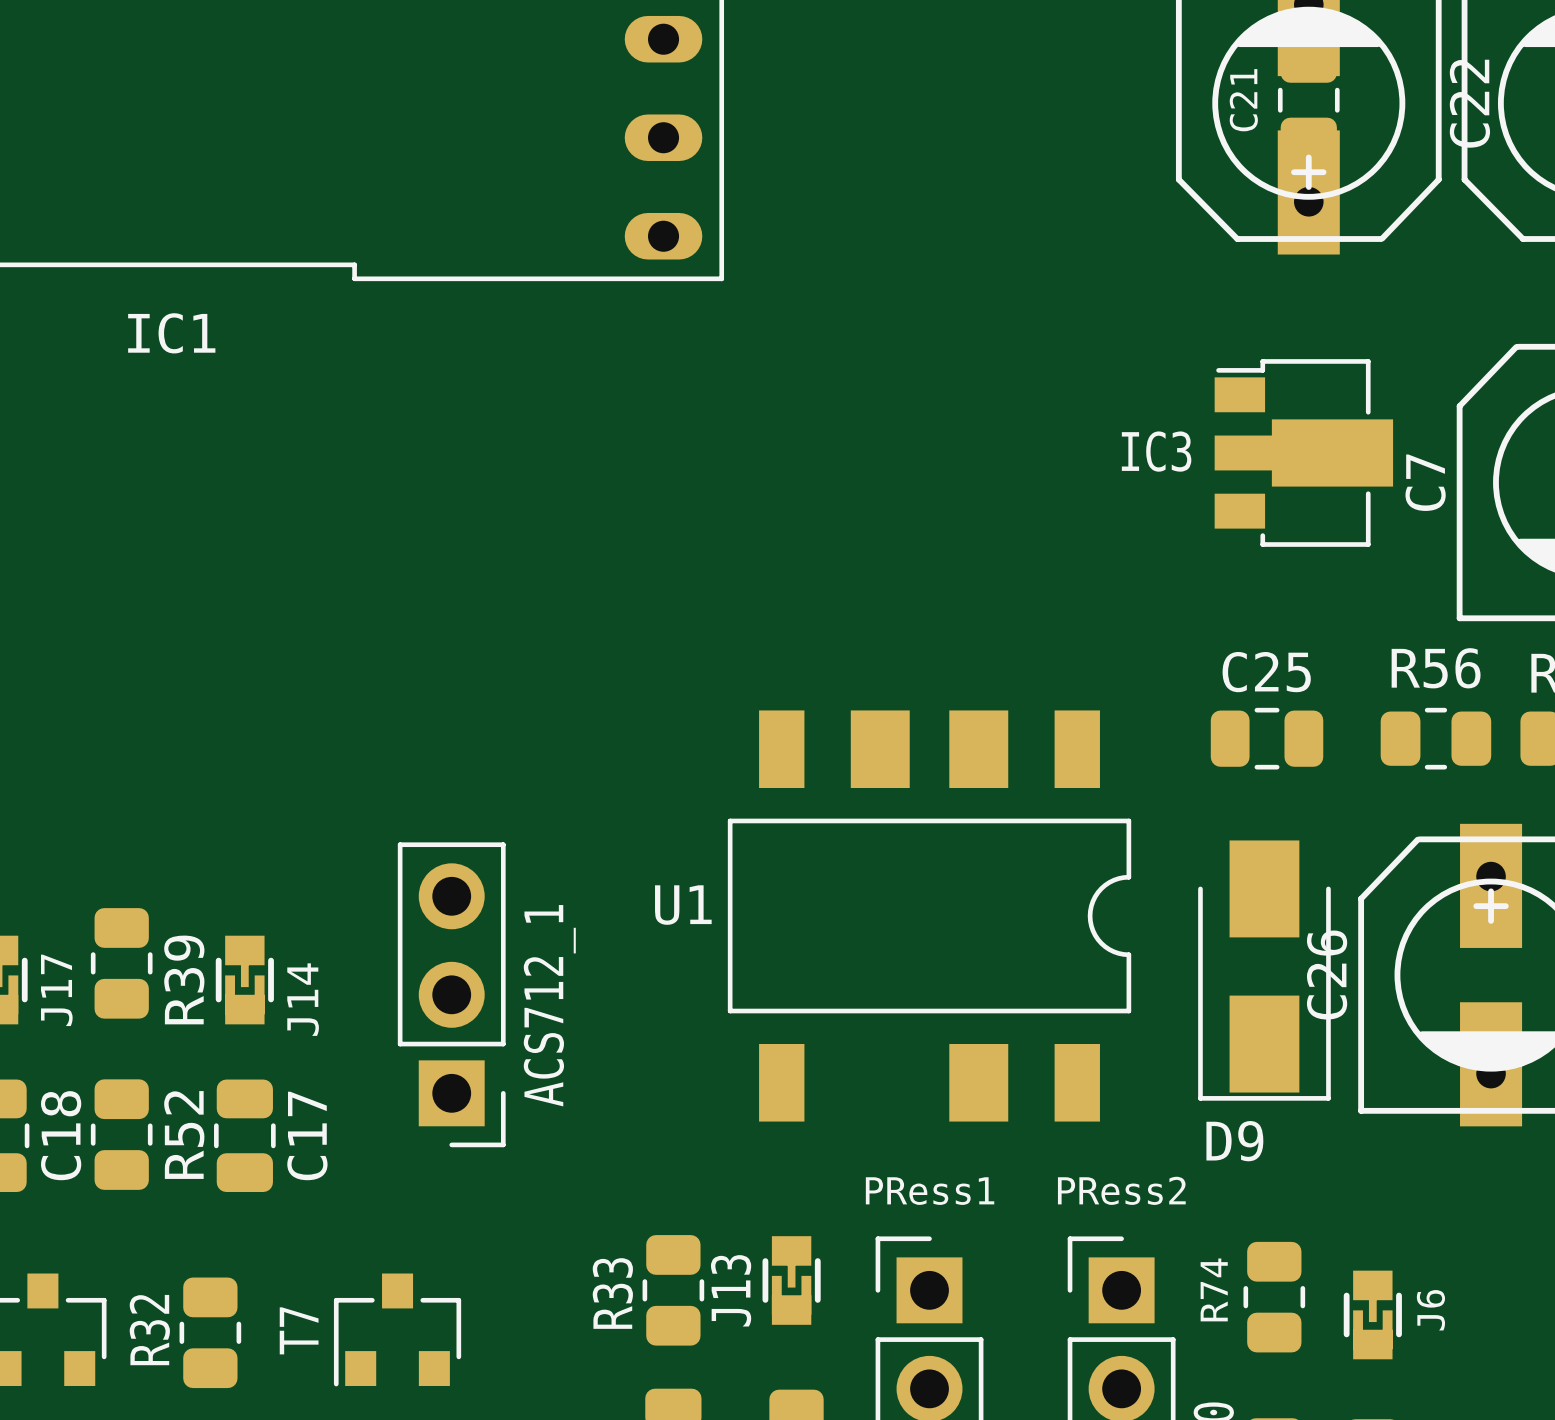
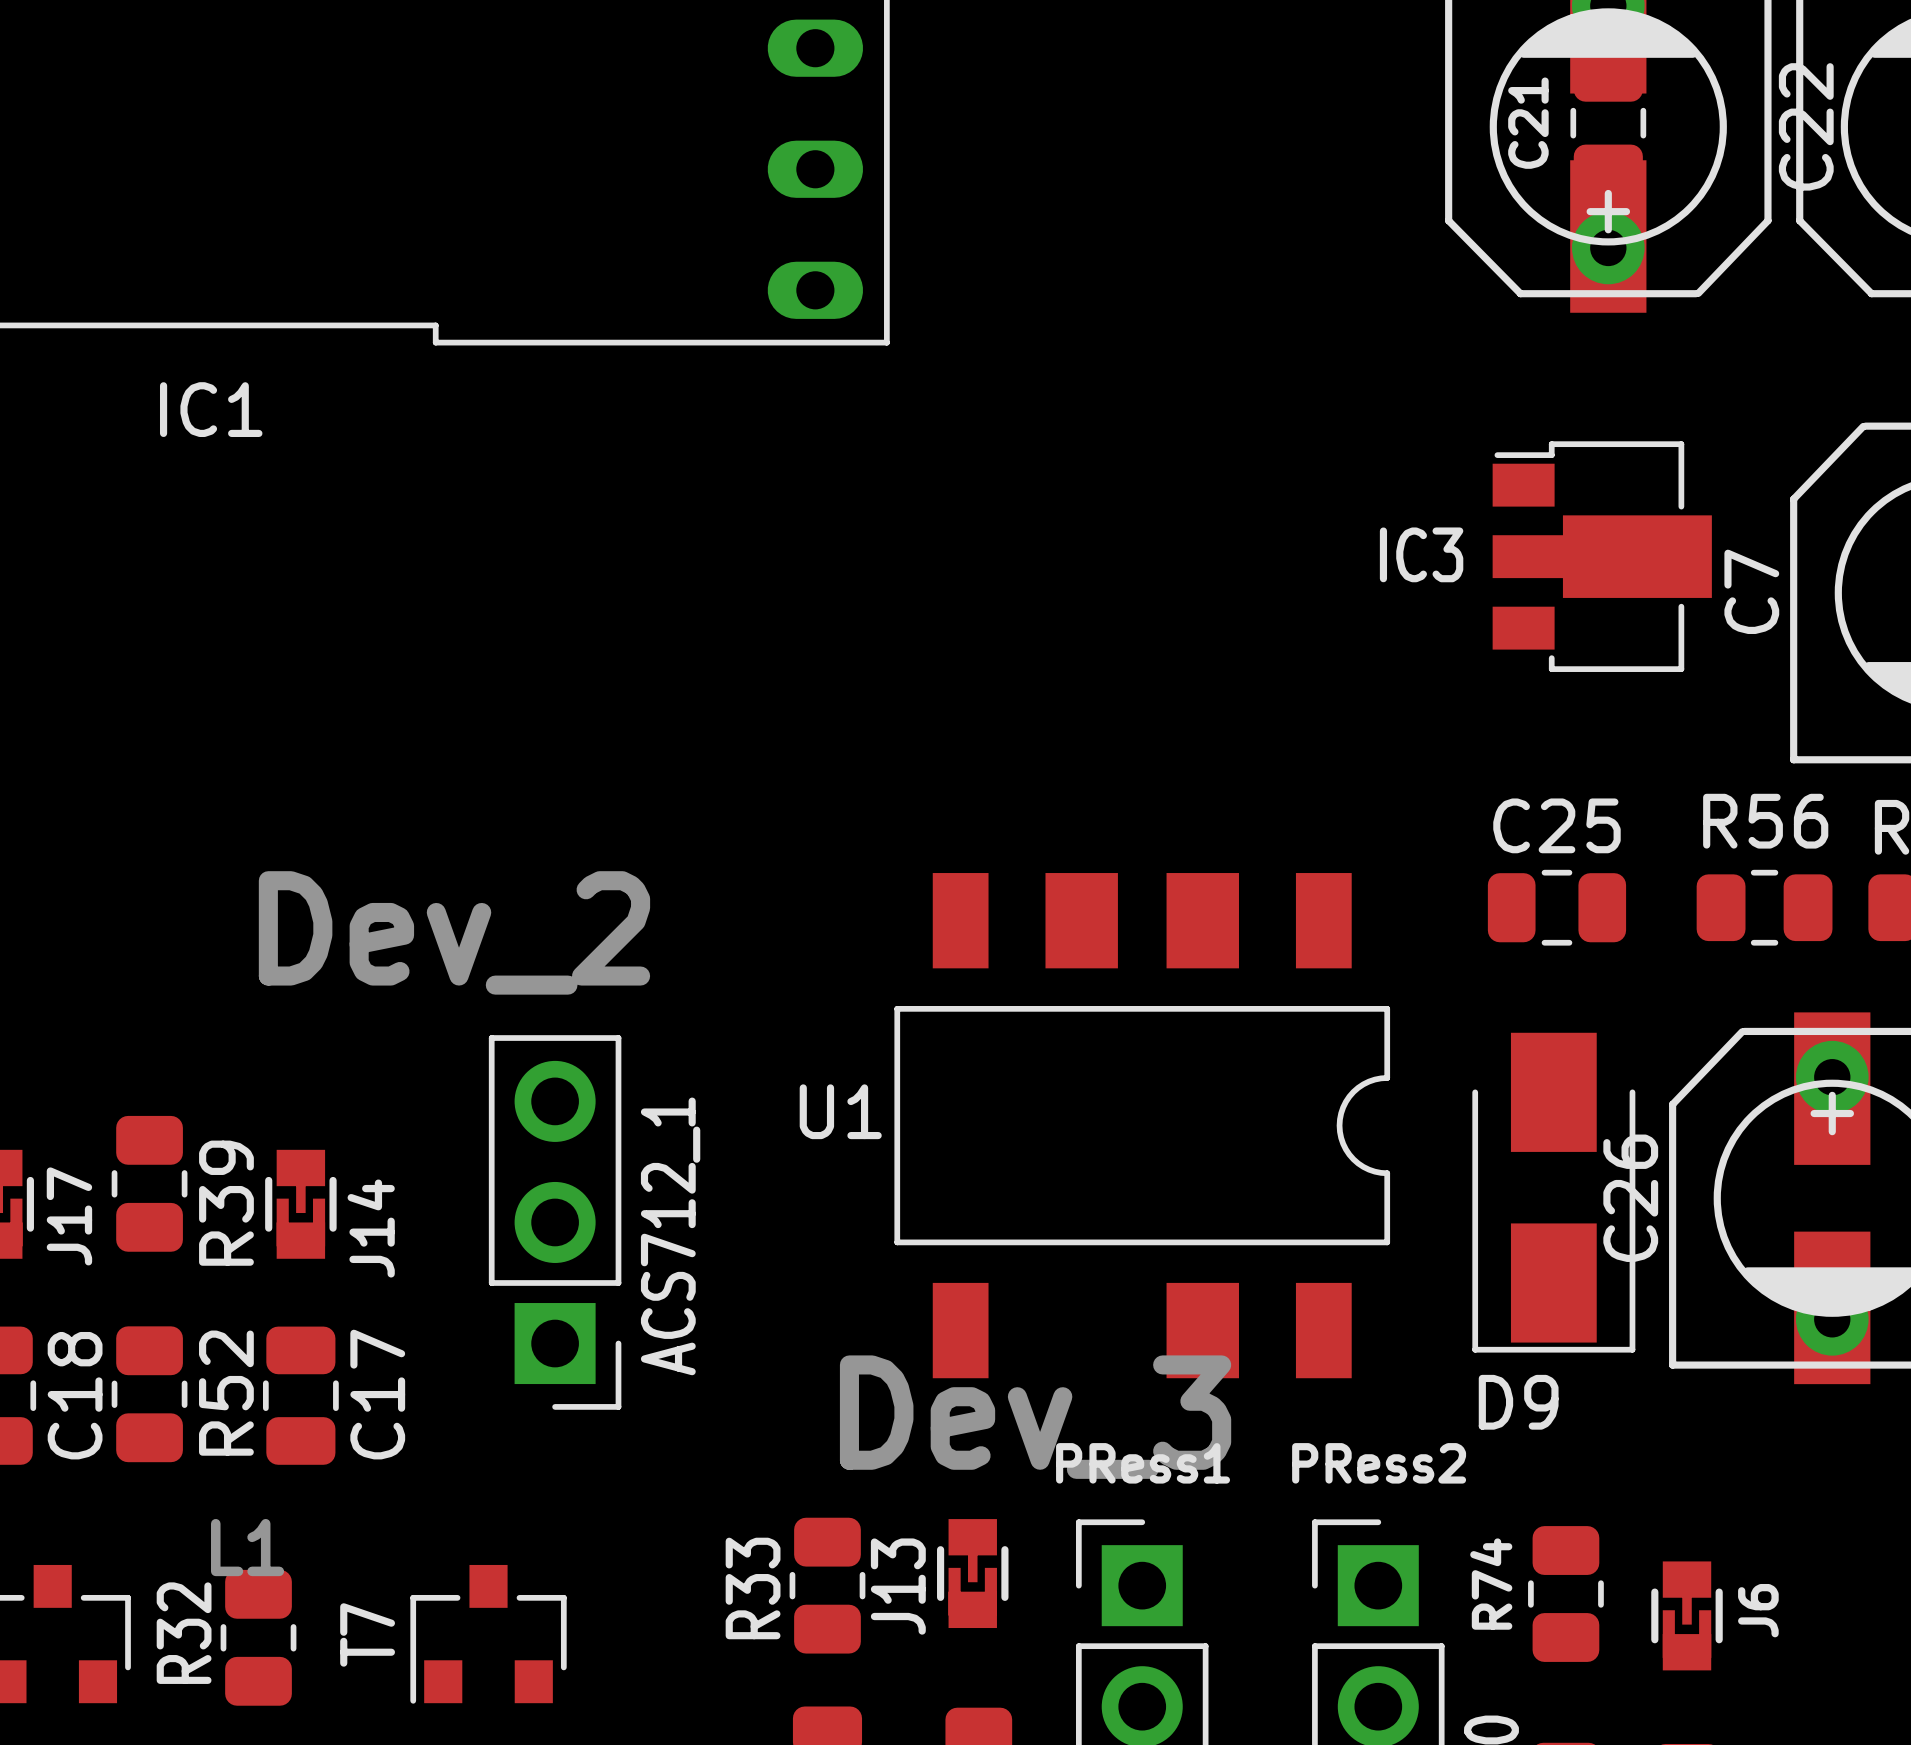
text: none -> Dev_2 (454, 932)
text: none -> Dev_3 (1035, 1417)
text: none -> L1 (247, 1547)

